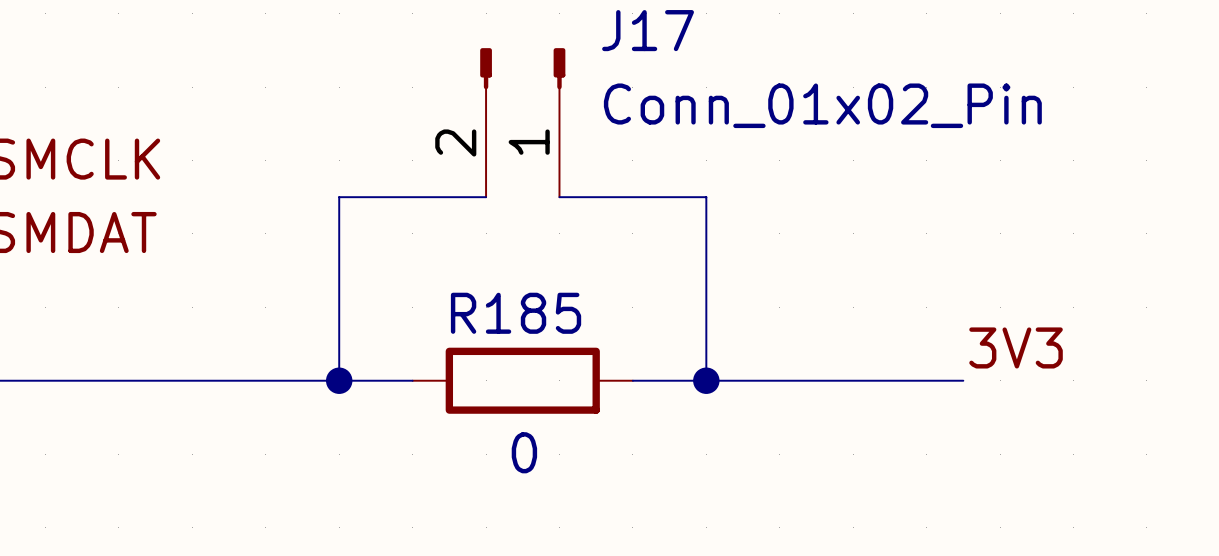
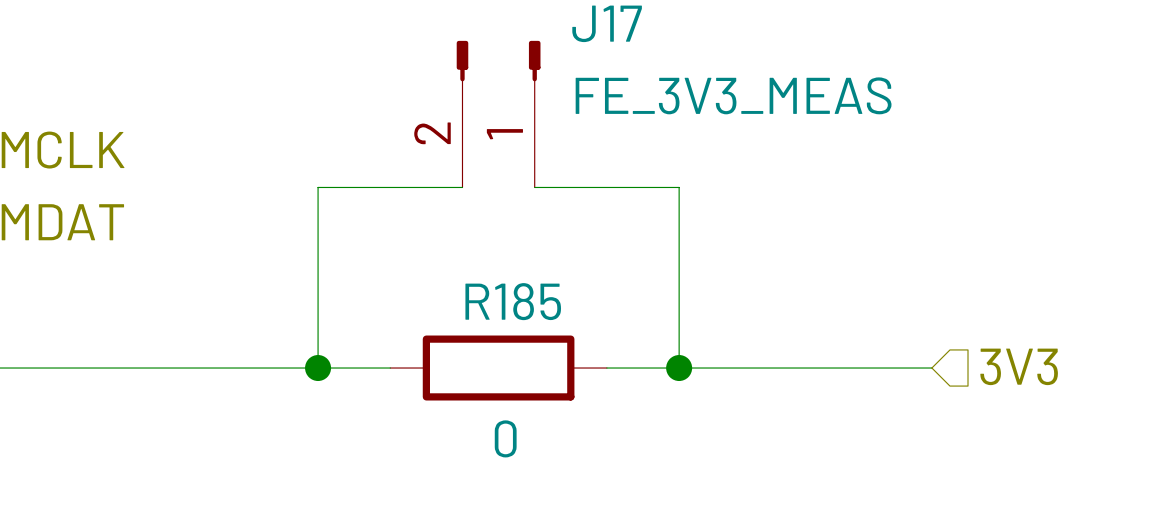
J17 value: Conn_01x02_Pin (822, 105) -> FE_3V3_MEAS (733, 95)
label: 3V3 (1016, 347) -> none
hierarchical label: none -> 3V3 (1019, 366)

